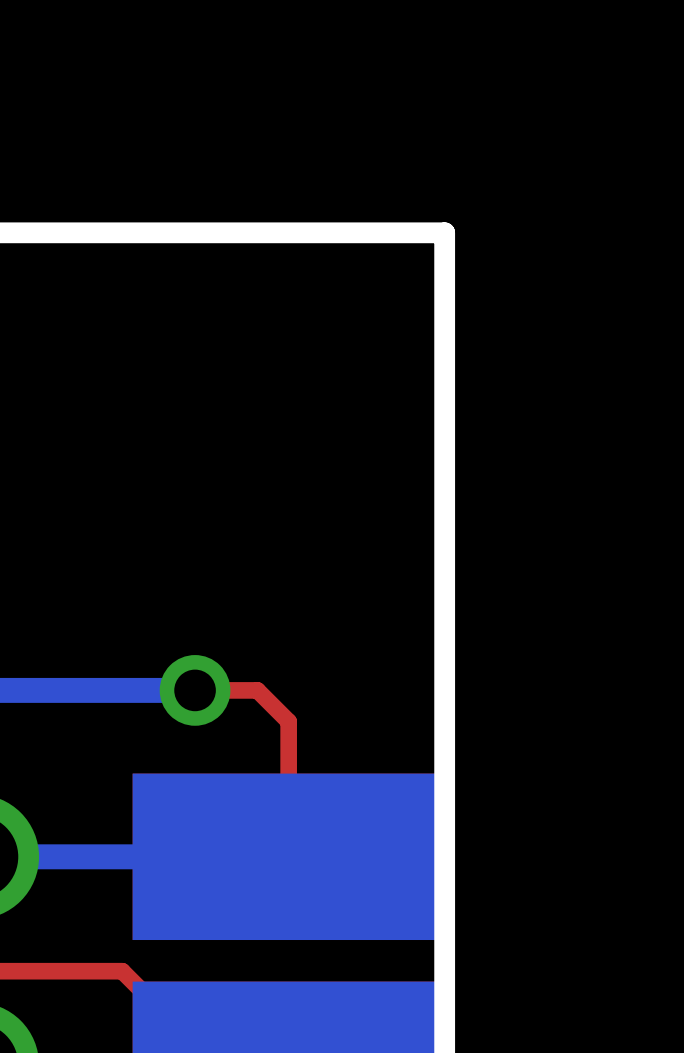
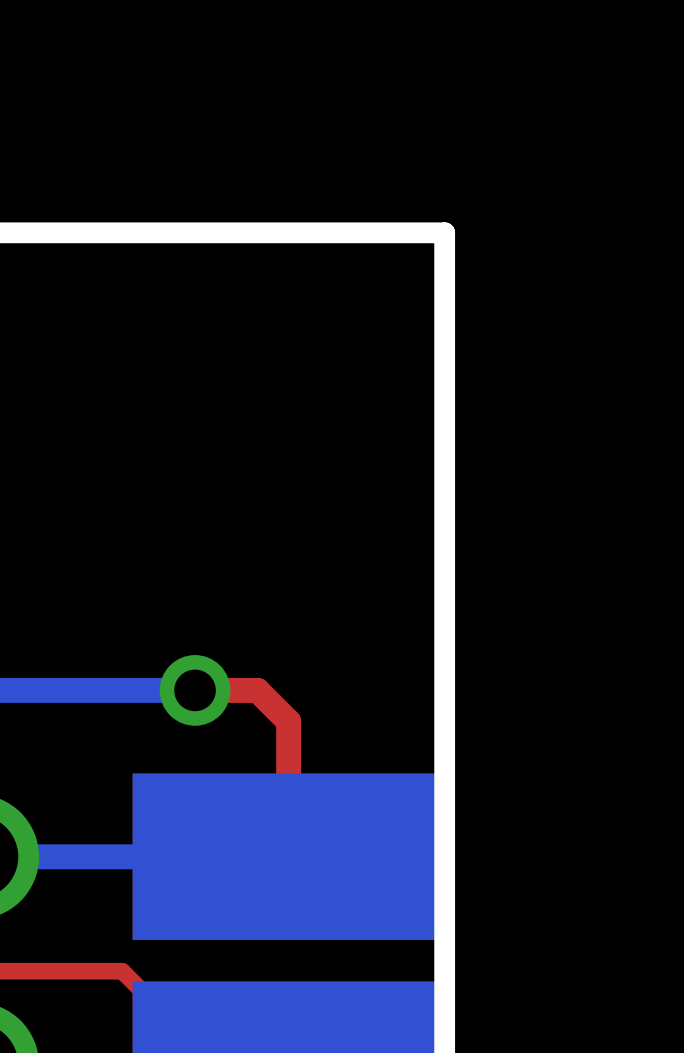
top track width: thin (195, 690) (257, 690) (288, 721) (288, 784) -> thick (195, 690) (257, 690) (288, 721) (288, 784)

